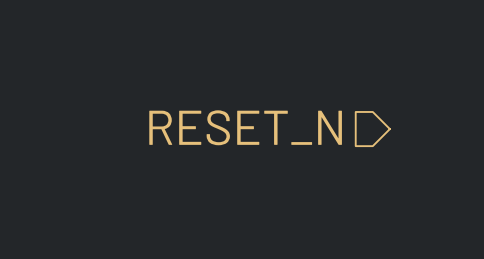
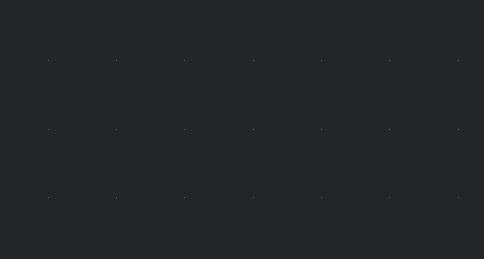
hierarchical label: RESET_N (245, 127) -> none

